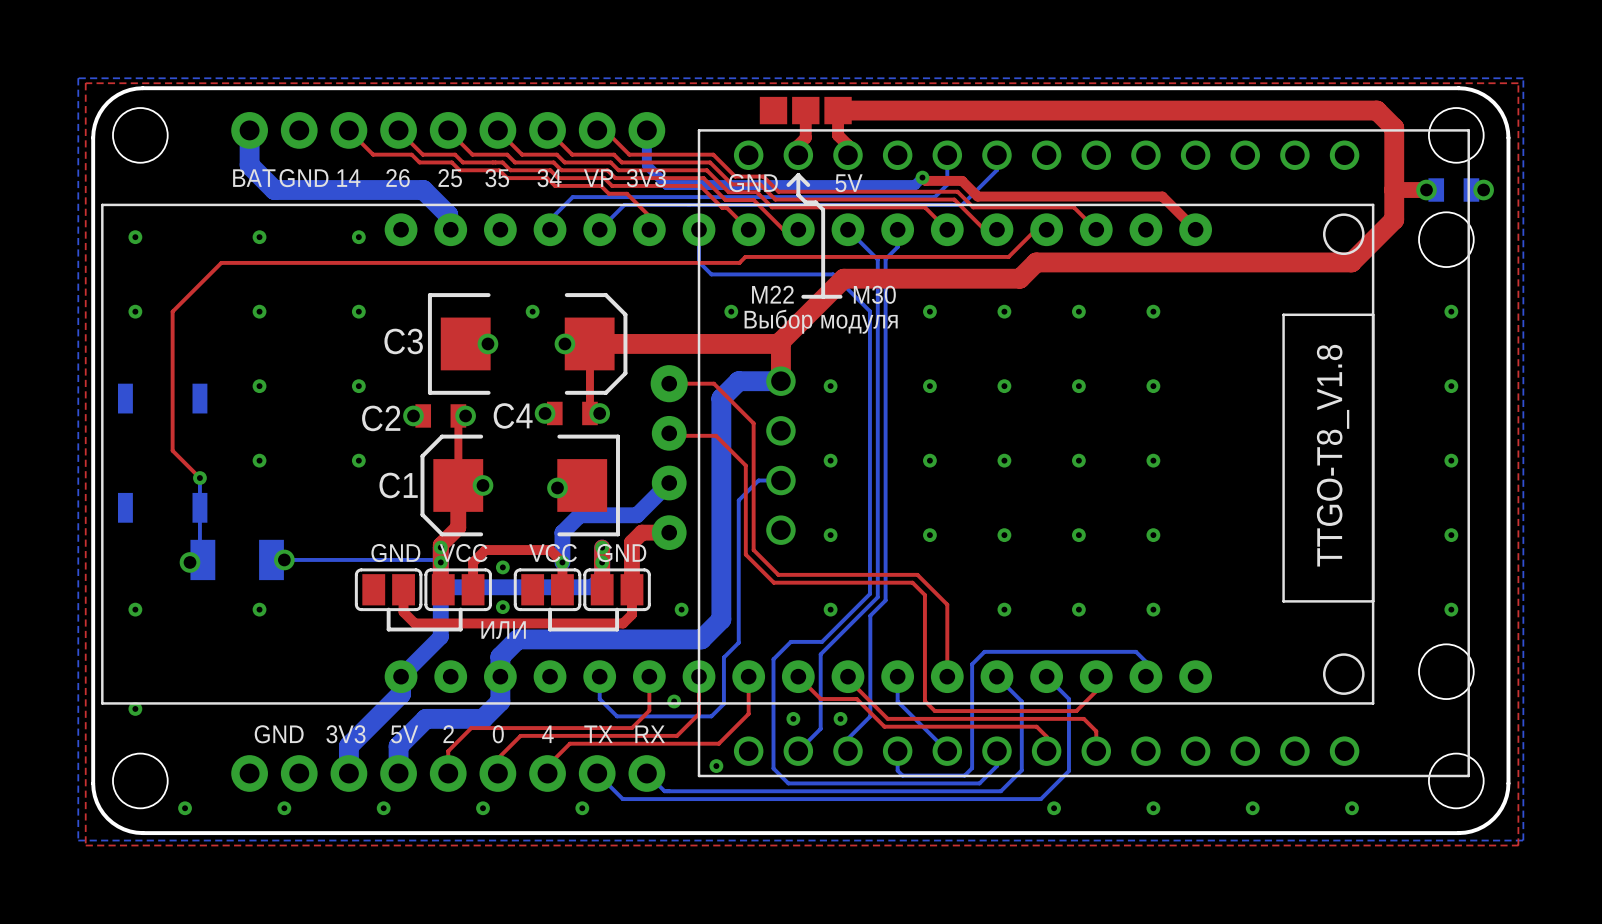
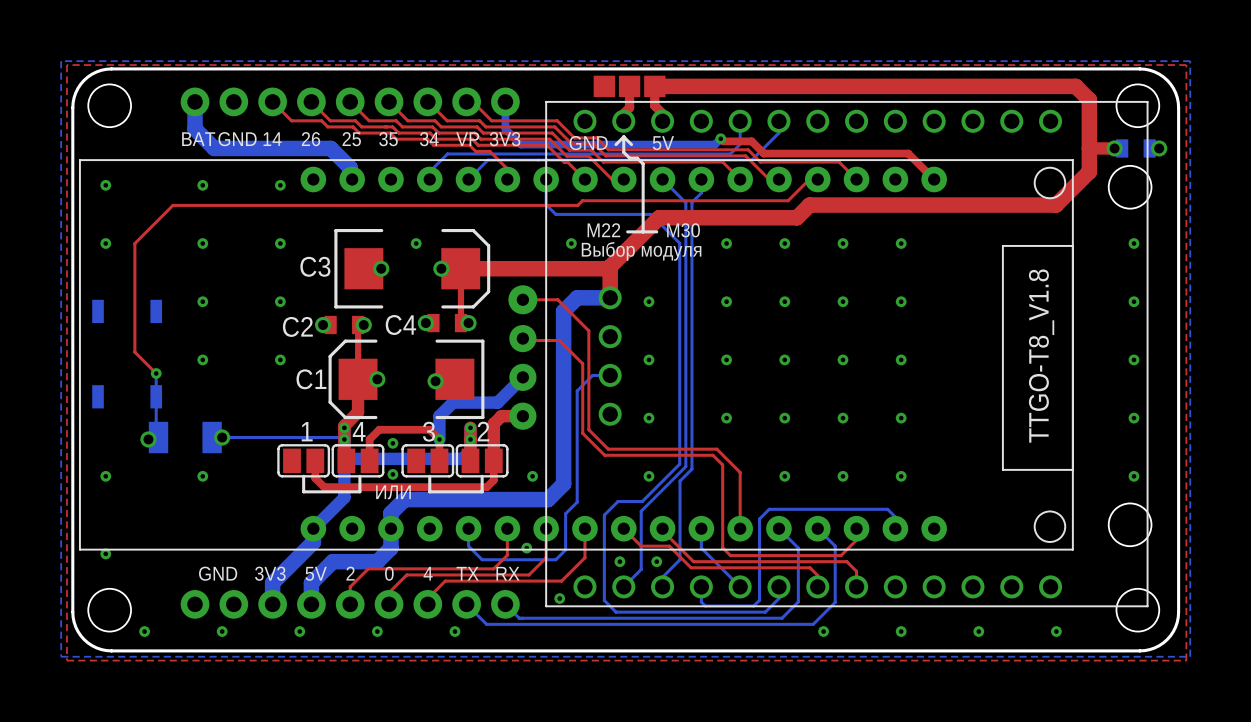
1 name: none -> 1 (307, 431)
4 name: none -> 4 (359, 431)
3 name: none -> 3 (428, 431)
2 name: none -> 2 (483, 431)
text: GND (395, 553) -> none
text: VCC (463, 553) -> none
text: VCC (553, 553) -> none
text: GND (621, 553) -> none

